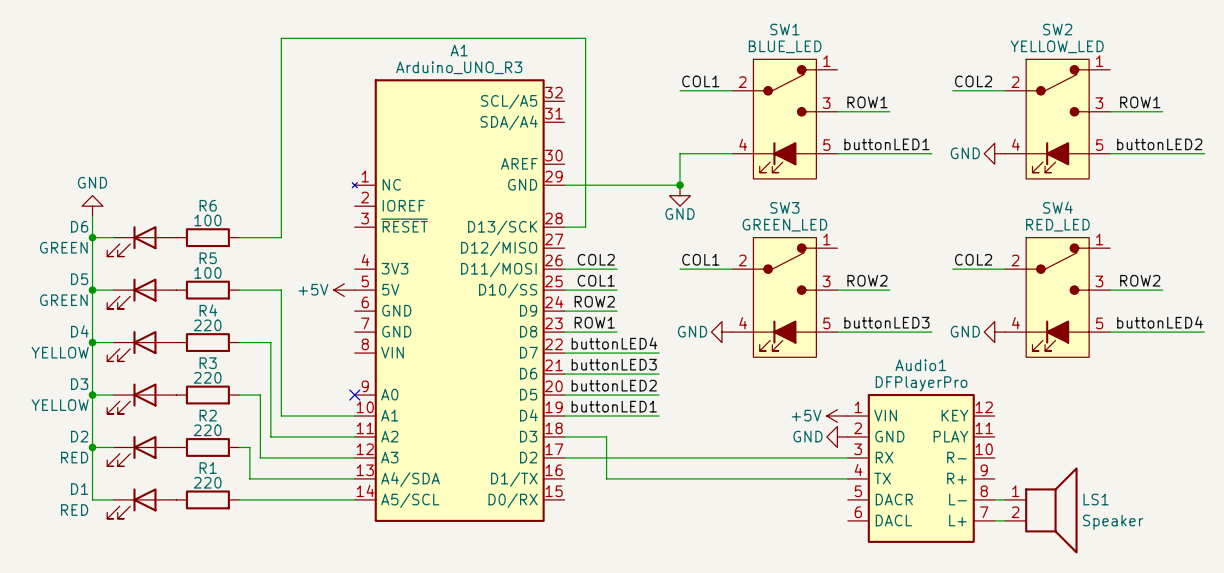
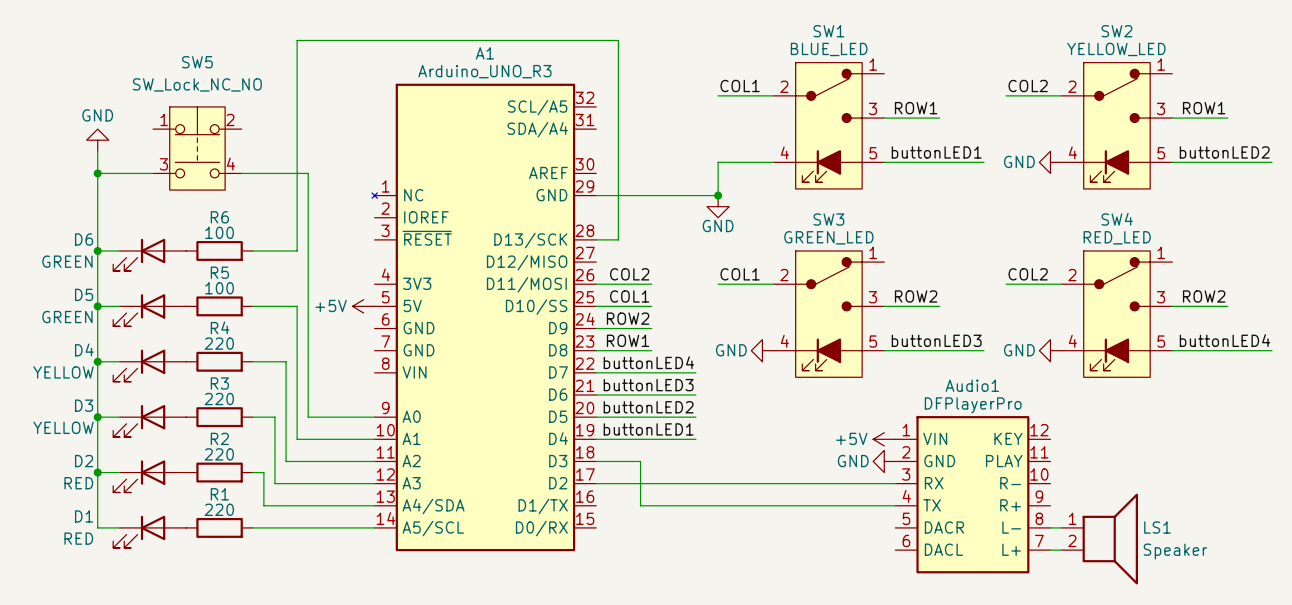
SW5: none -> SW_Lock_NC_NO (197, 148)
wire: none -> (97, 151) (97, 228)
wire: none -> (97, 173) (153, 173)
junction: none -> (97, 173)
wire: none -> (241, 173) (308, 173) (308, 417) (374, 417)
power symbol position: GND (92, 206) -> GND (97, 140)
no-connect mark: (354, 395) -> none

